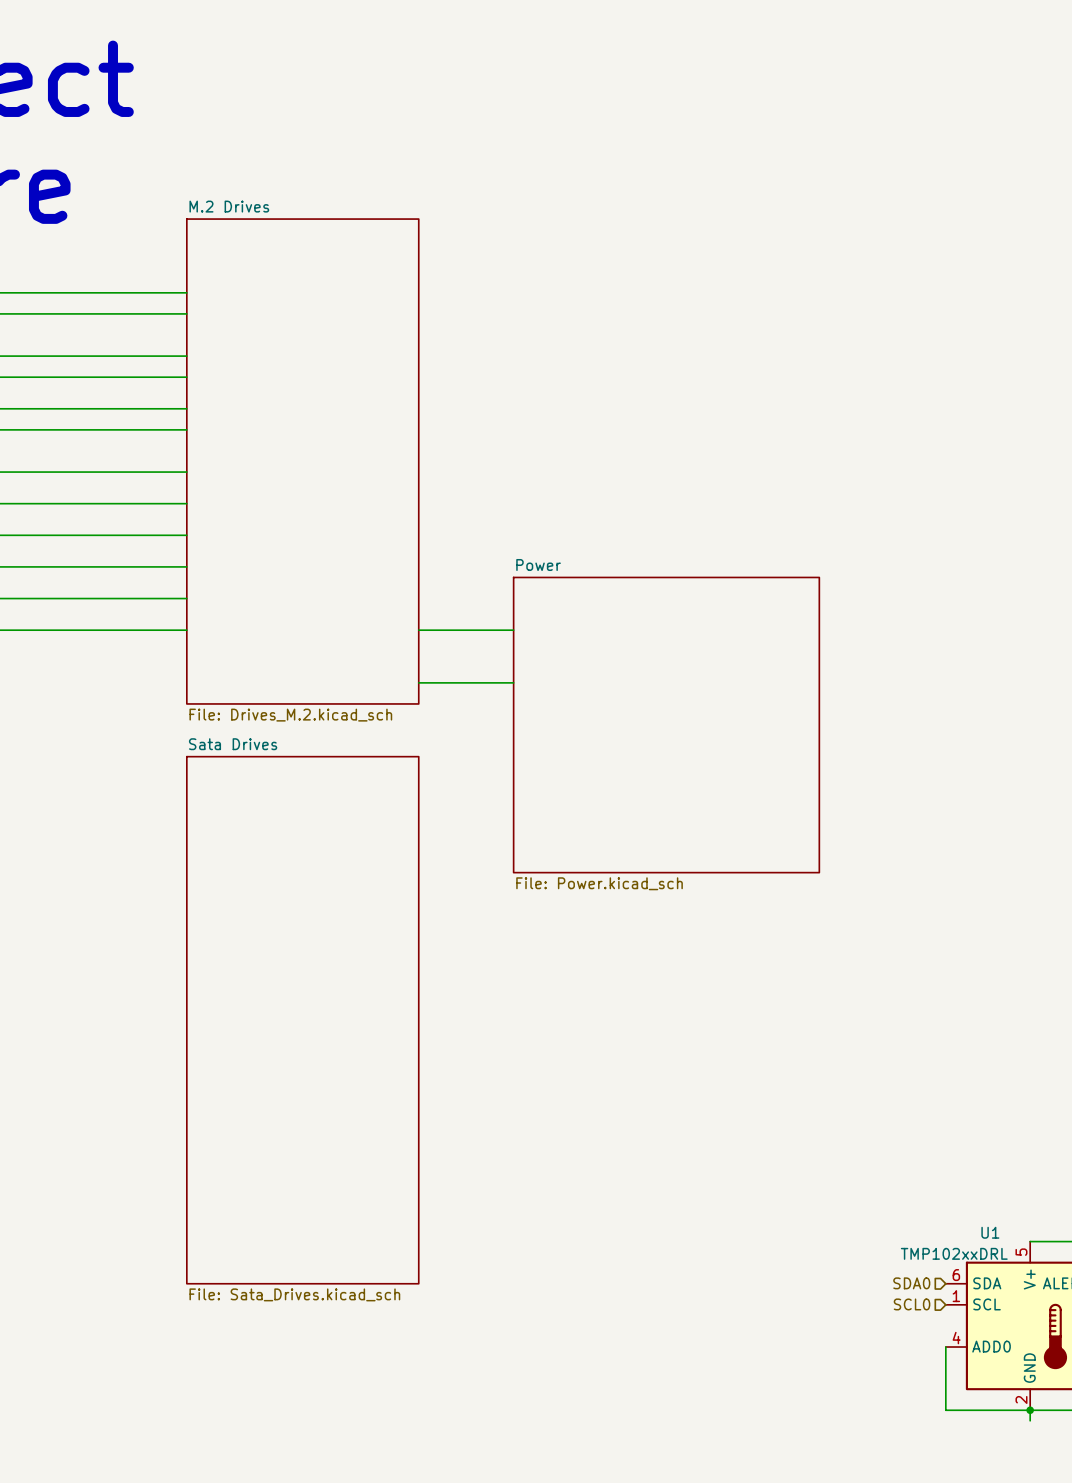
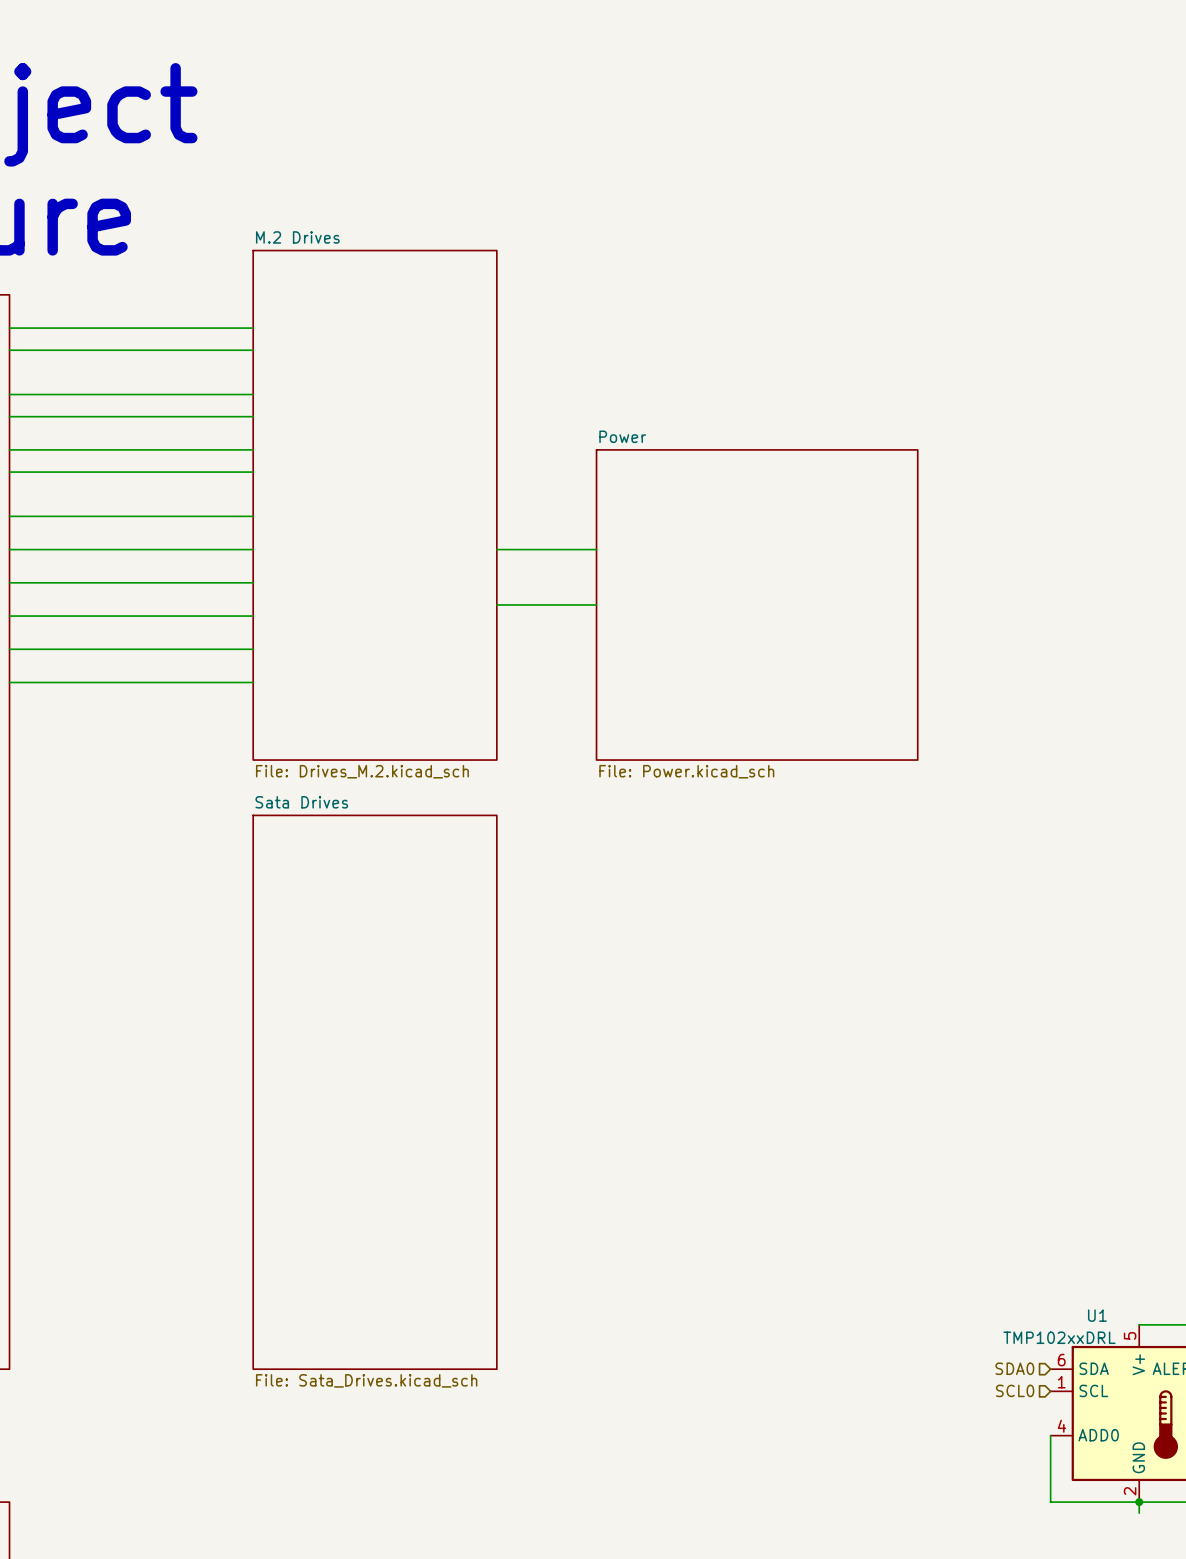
wire: (418, 630) (513, 630) -> (496, 604) (596, 604)
wire: (418, 682) (513, 682) -> (496, 549) (596, 549)
sheet Power position: (666, 725) -> (757, 604)

